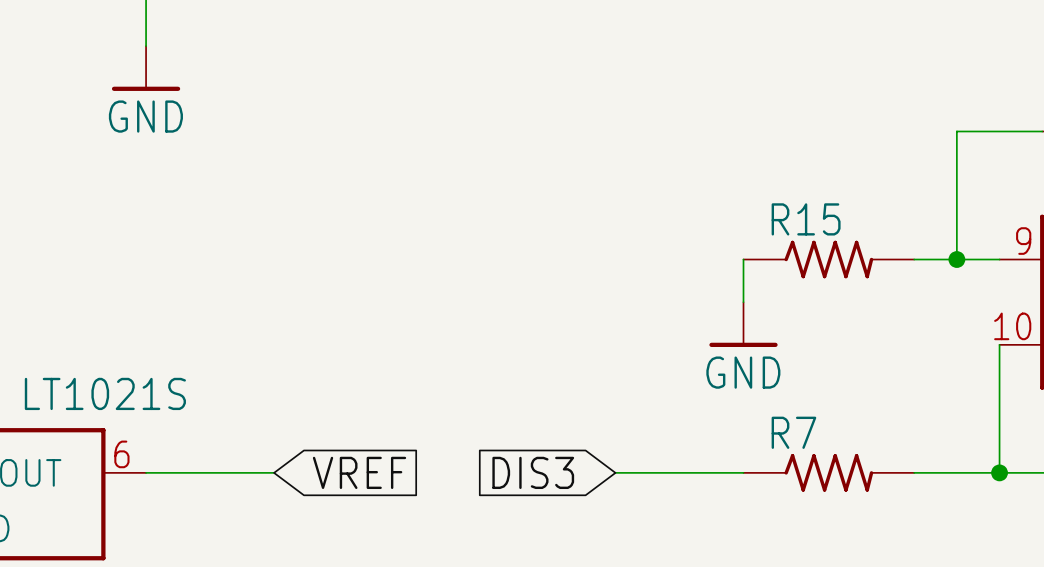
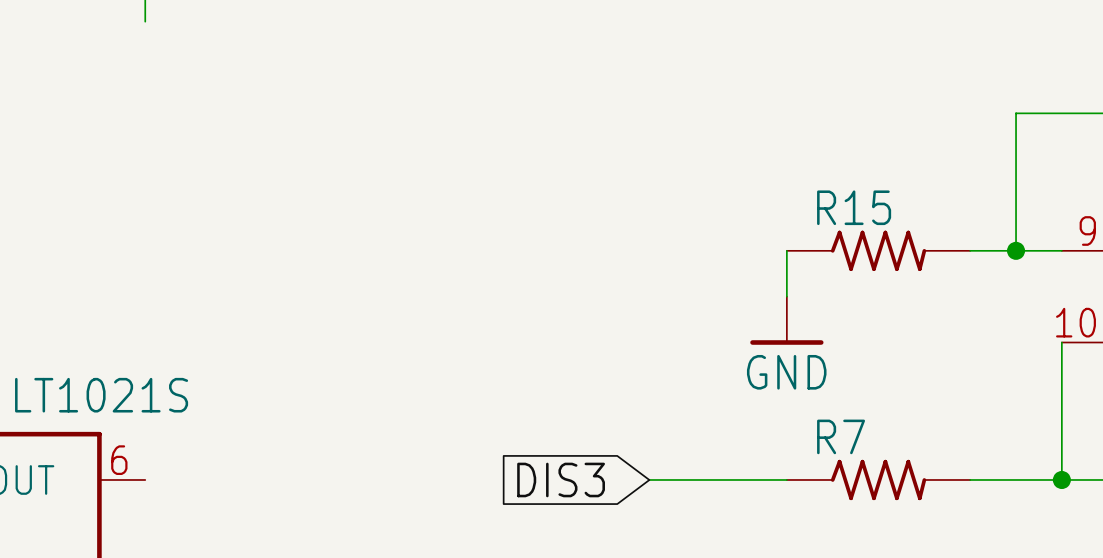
power symbol: GND (146, 68) -> none
wire: (146, 472) (274, 472) -> none
global label: VREF (359, 472) -> none

